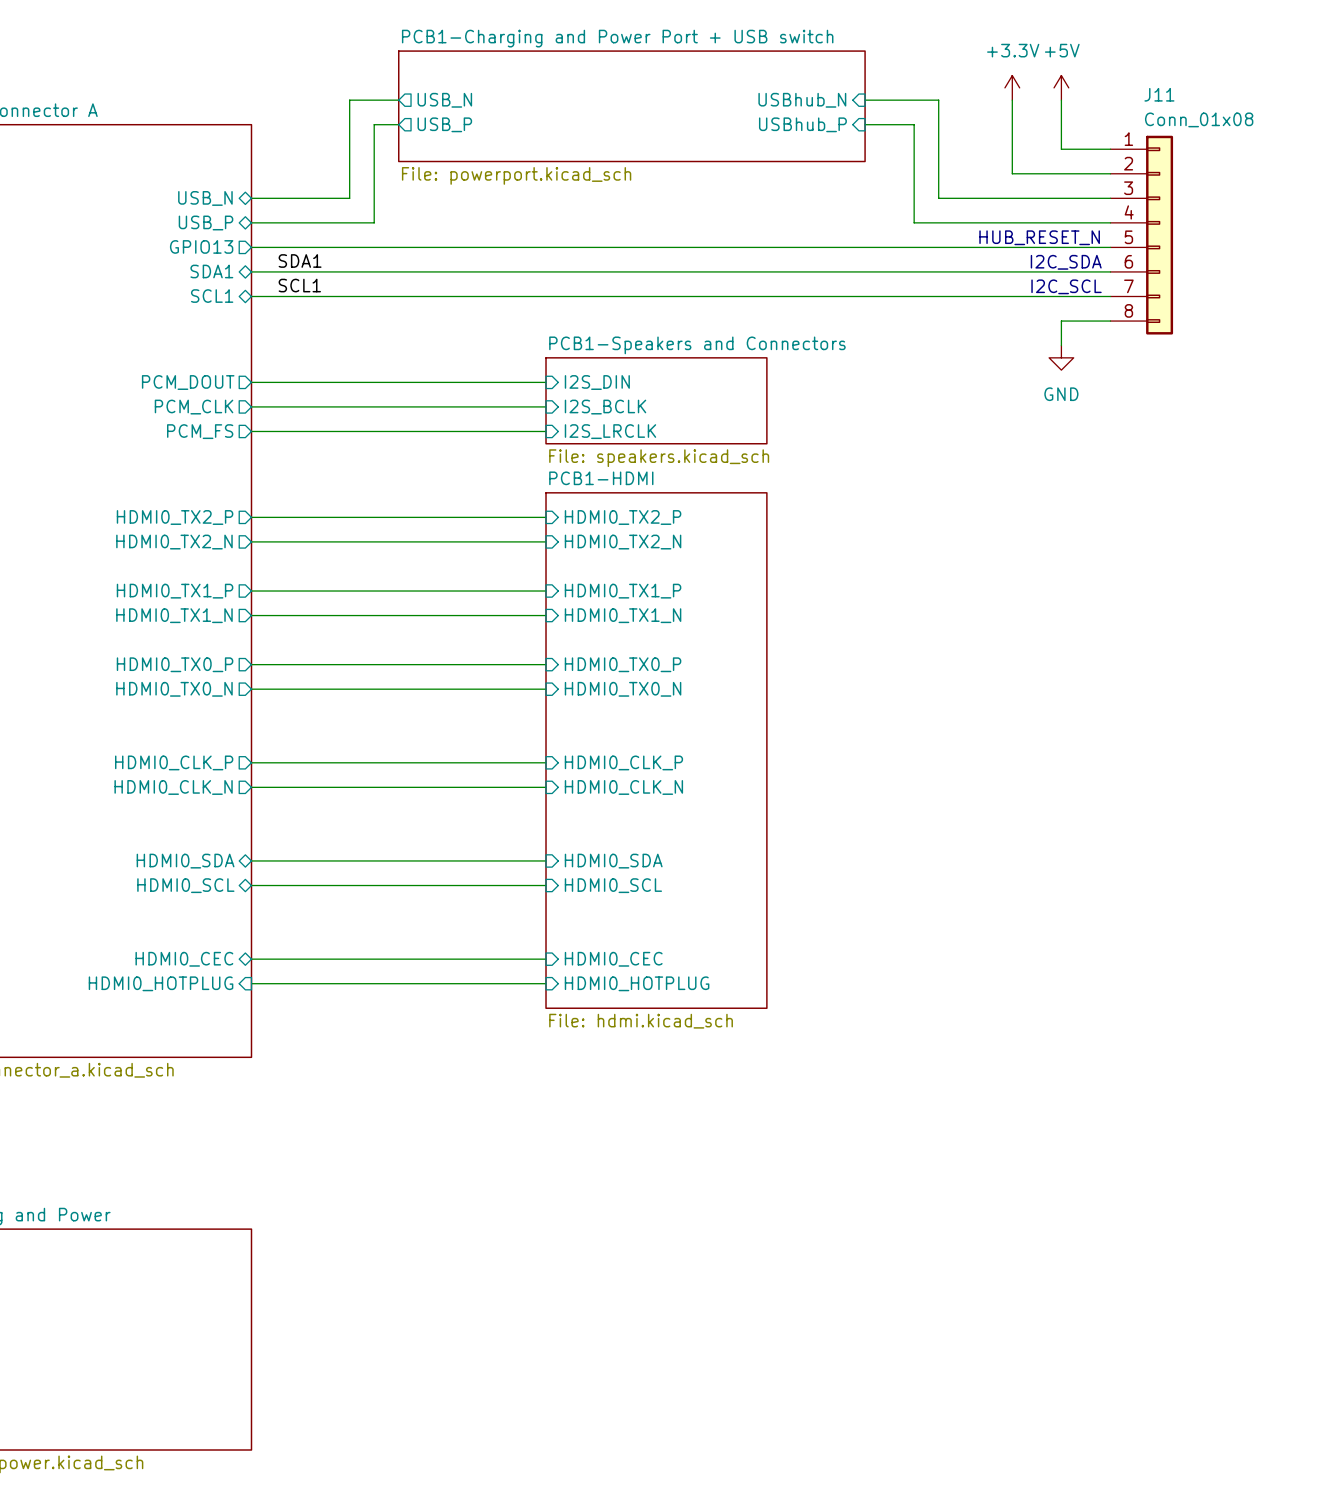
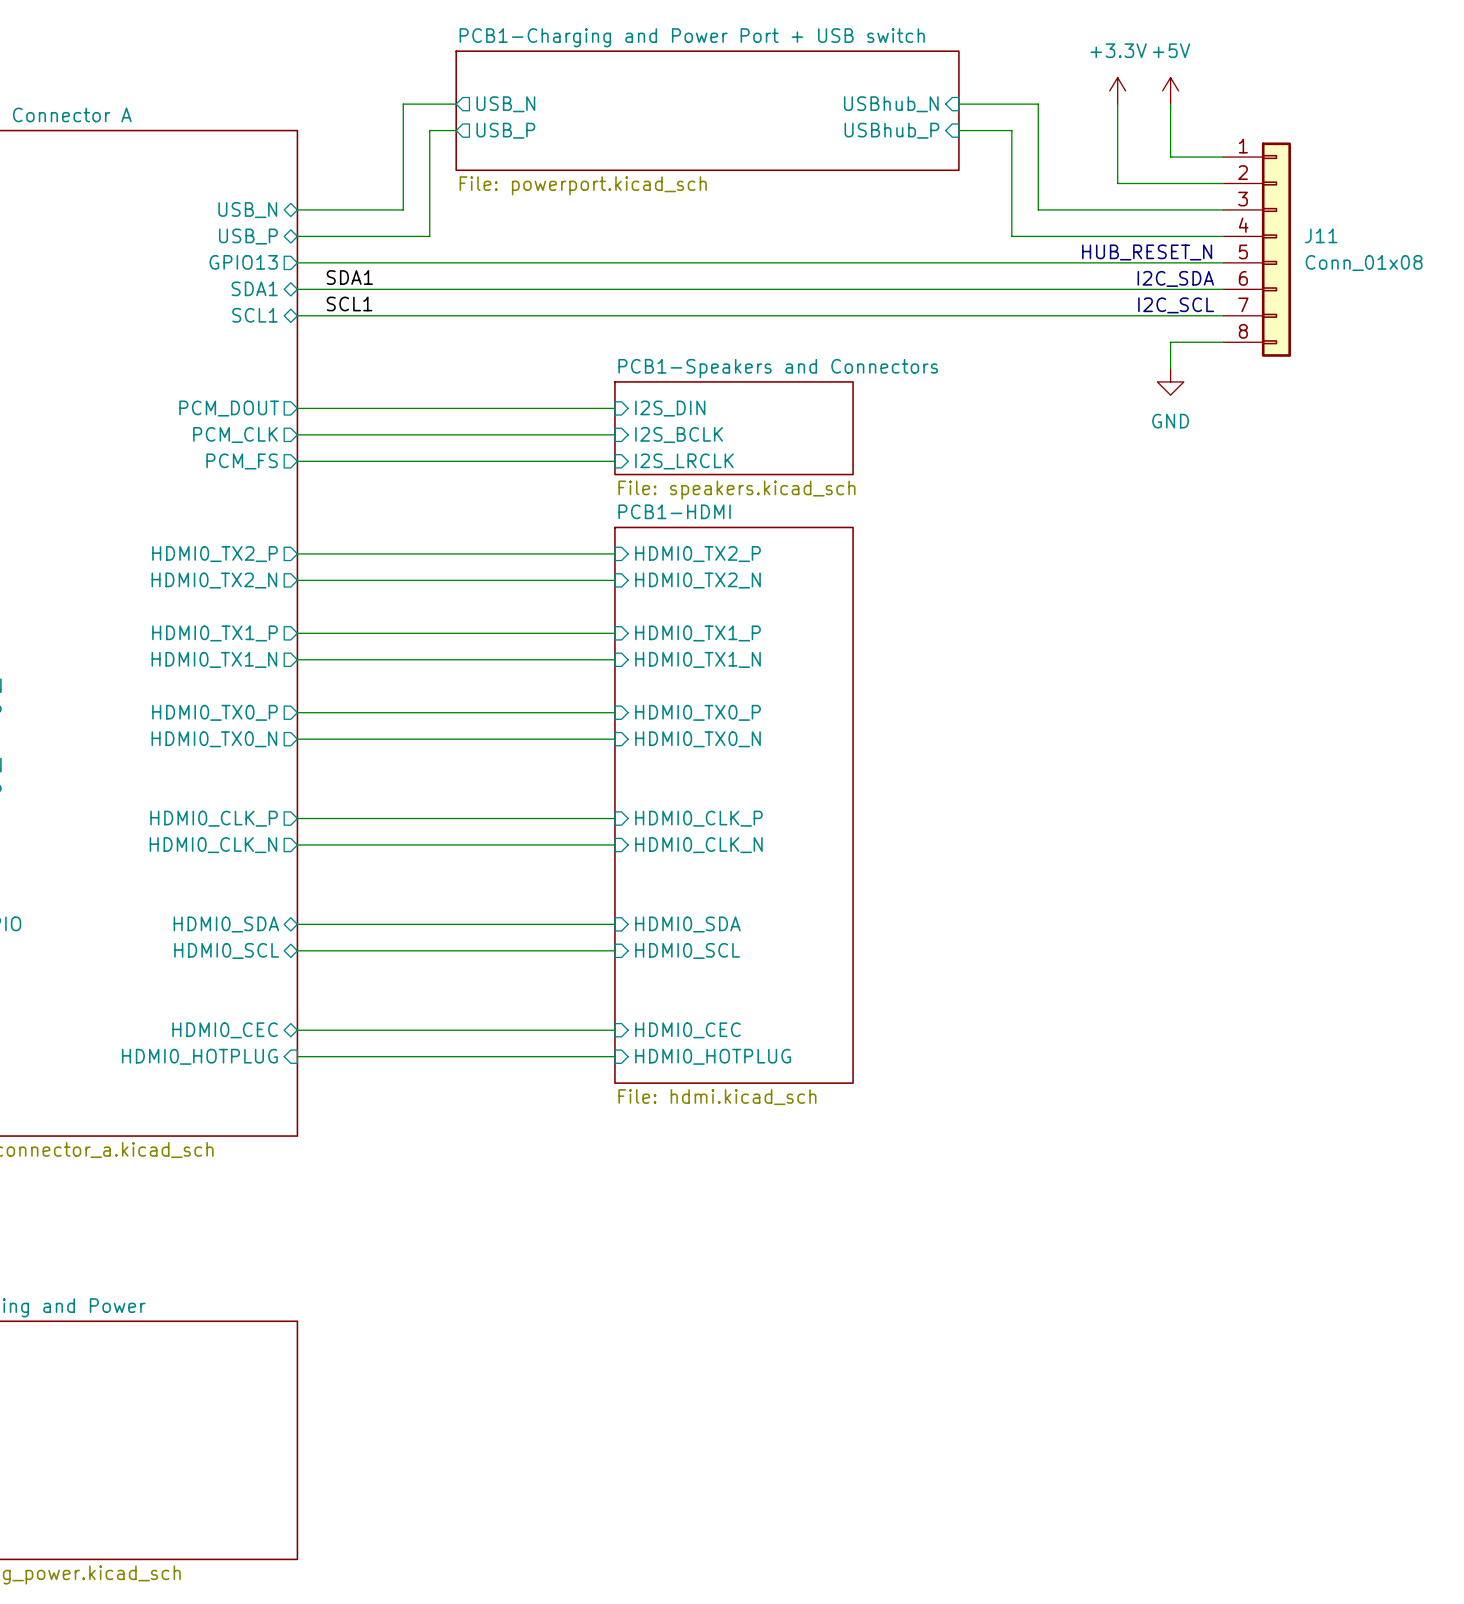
J11 name position: J11 (1159, 94) -> J11 (1321, 235)
J11 value position: Conn_01x08 (1199, 119) -> Conn_01x08 (1364, 263)

